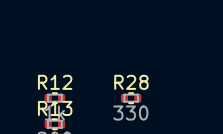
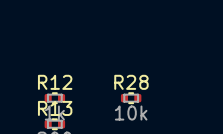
R28 value: 330 (130, 113) -> 10k (131, 113)

